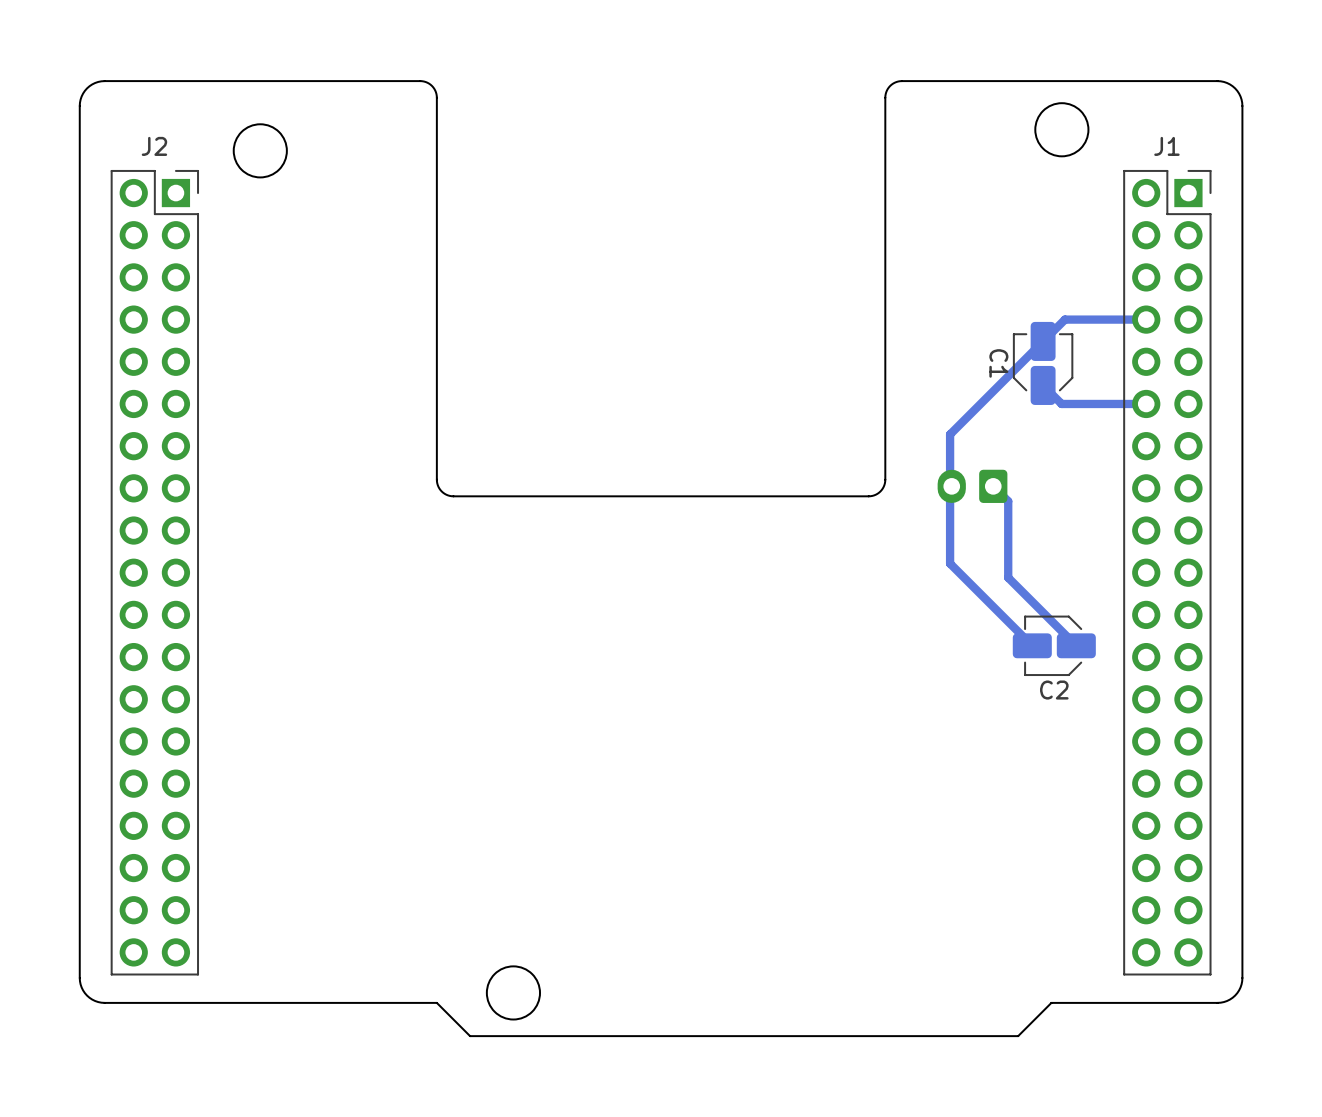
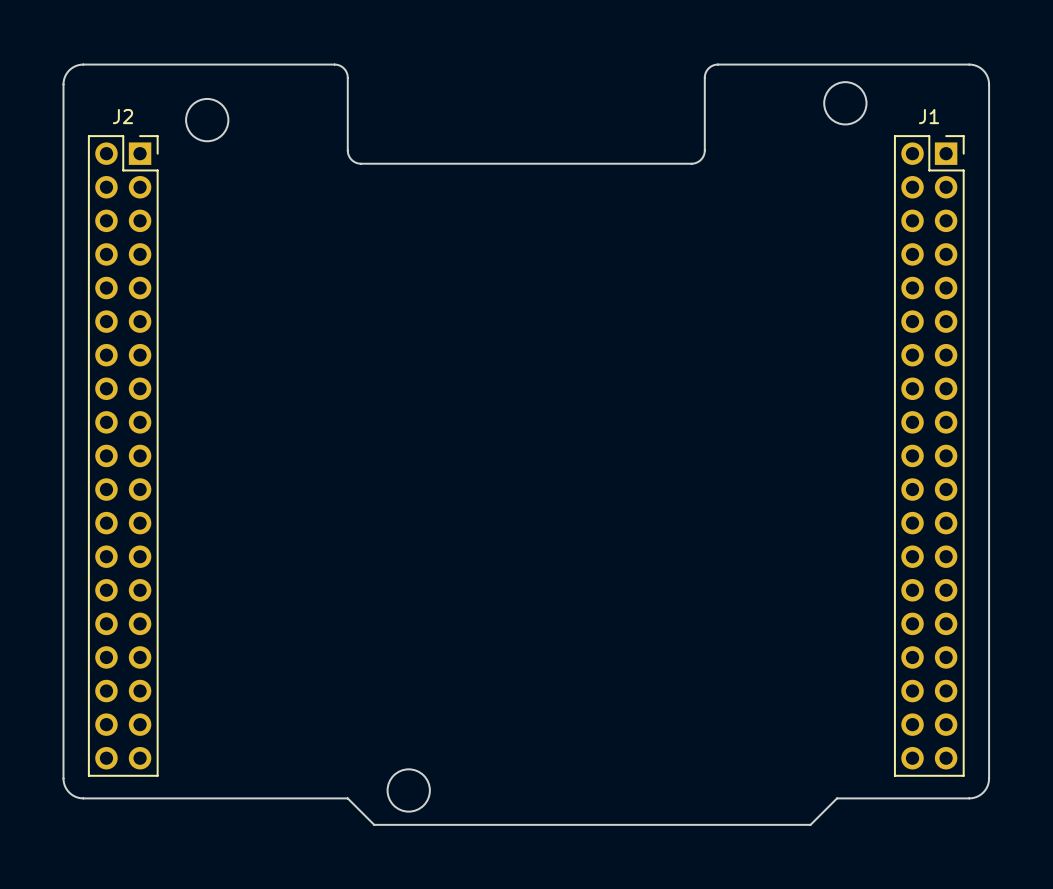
board edge: (885, 189) (885, 479) (880, 491) (868, 496) (453, 496) (443, 492) (438, 486) (436, 479) (436, 189) -> (704, 150) (700, 159) (691, 163) (361, 163) (351, 159) (347, 150)
track: (1146, 319) (1064, 319) (950, 434) (950, 563) (1032, 645) -> none
C1: (1043, 363) -> none
track: (1043, 385) (1061, 403) (1146, 403) -> none
part: (972, 486) -> none
track: (993, 486) (1008, 501) (1008, 577) (1076, 645) -> none
C2: (1054, 645) -> none

